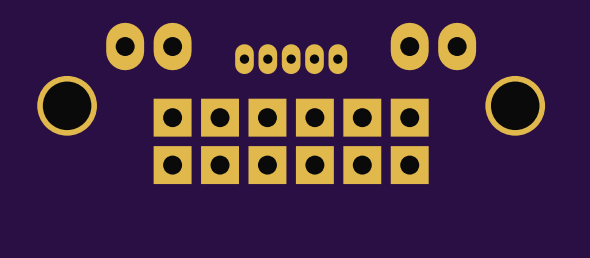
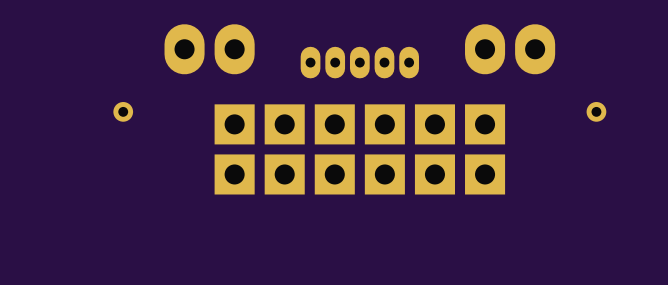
part footprint: [37, 75, 97, 136] -> [113, 102, 134, 122]
part footprint: [485, 75, 546, 136] -> [586, 102, 607, 122]

